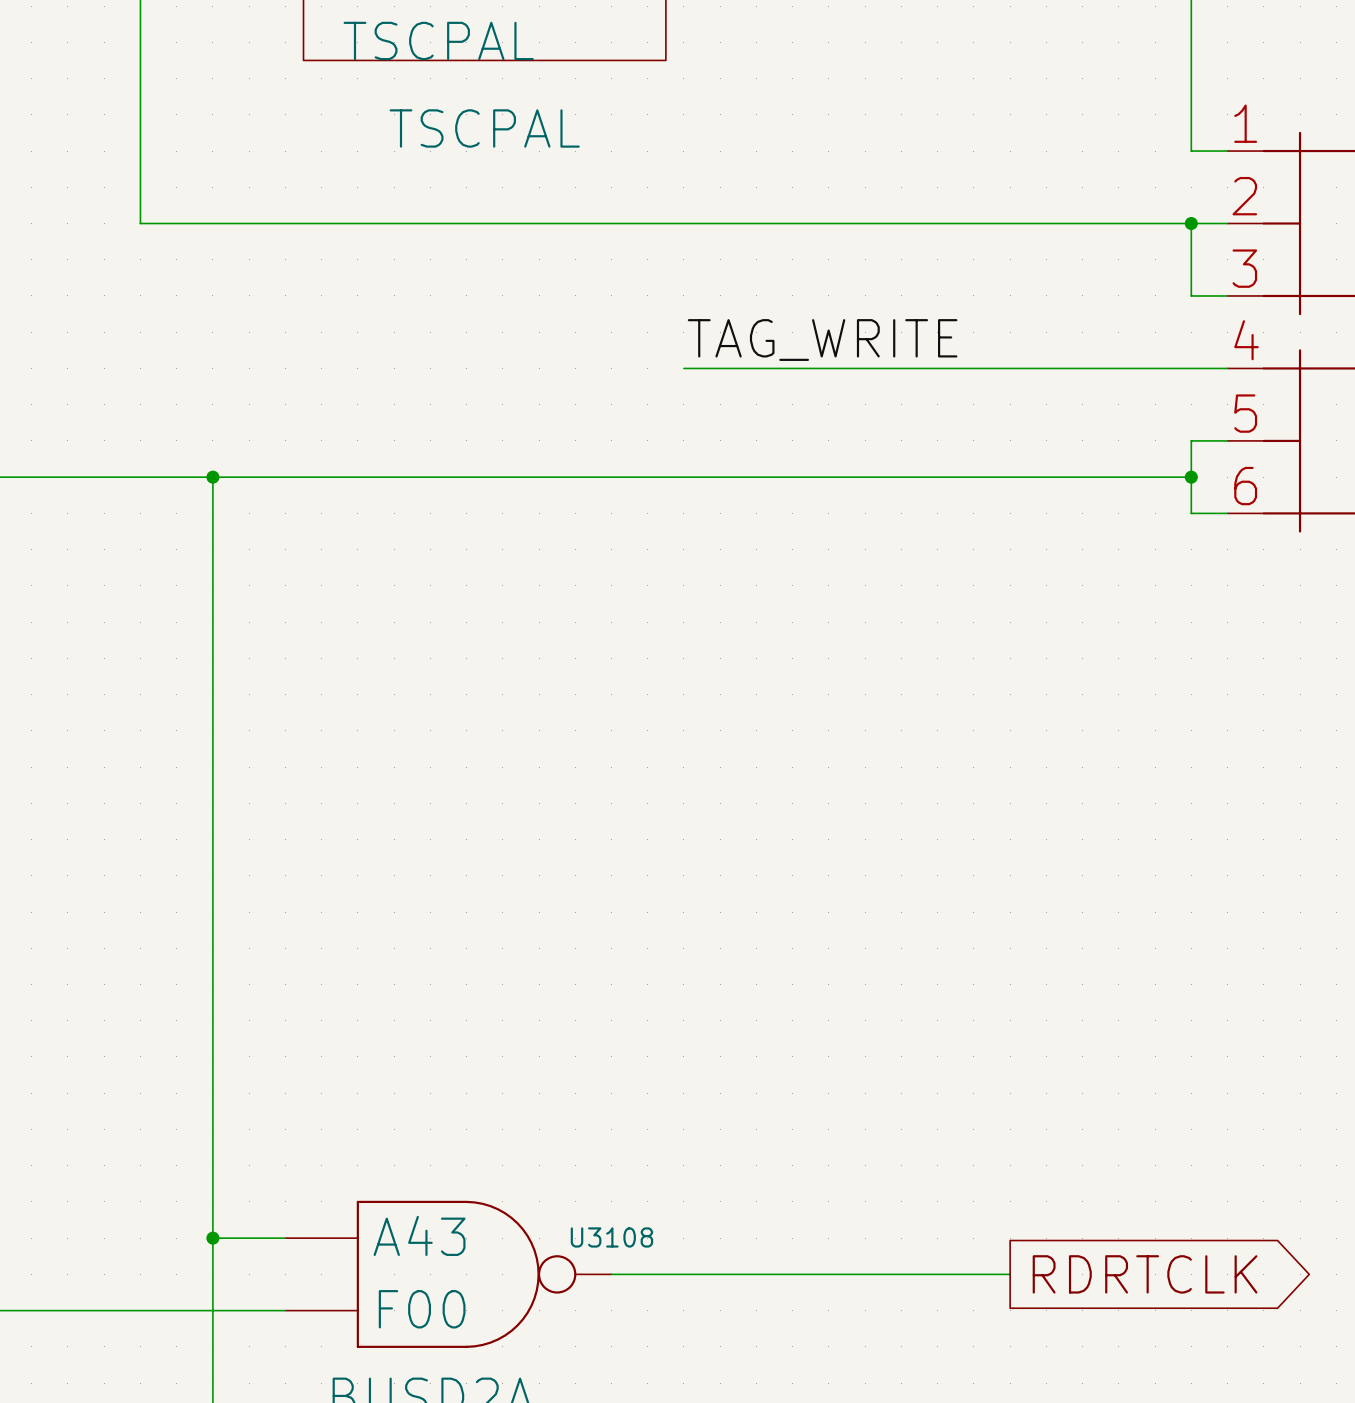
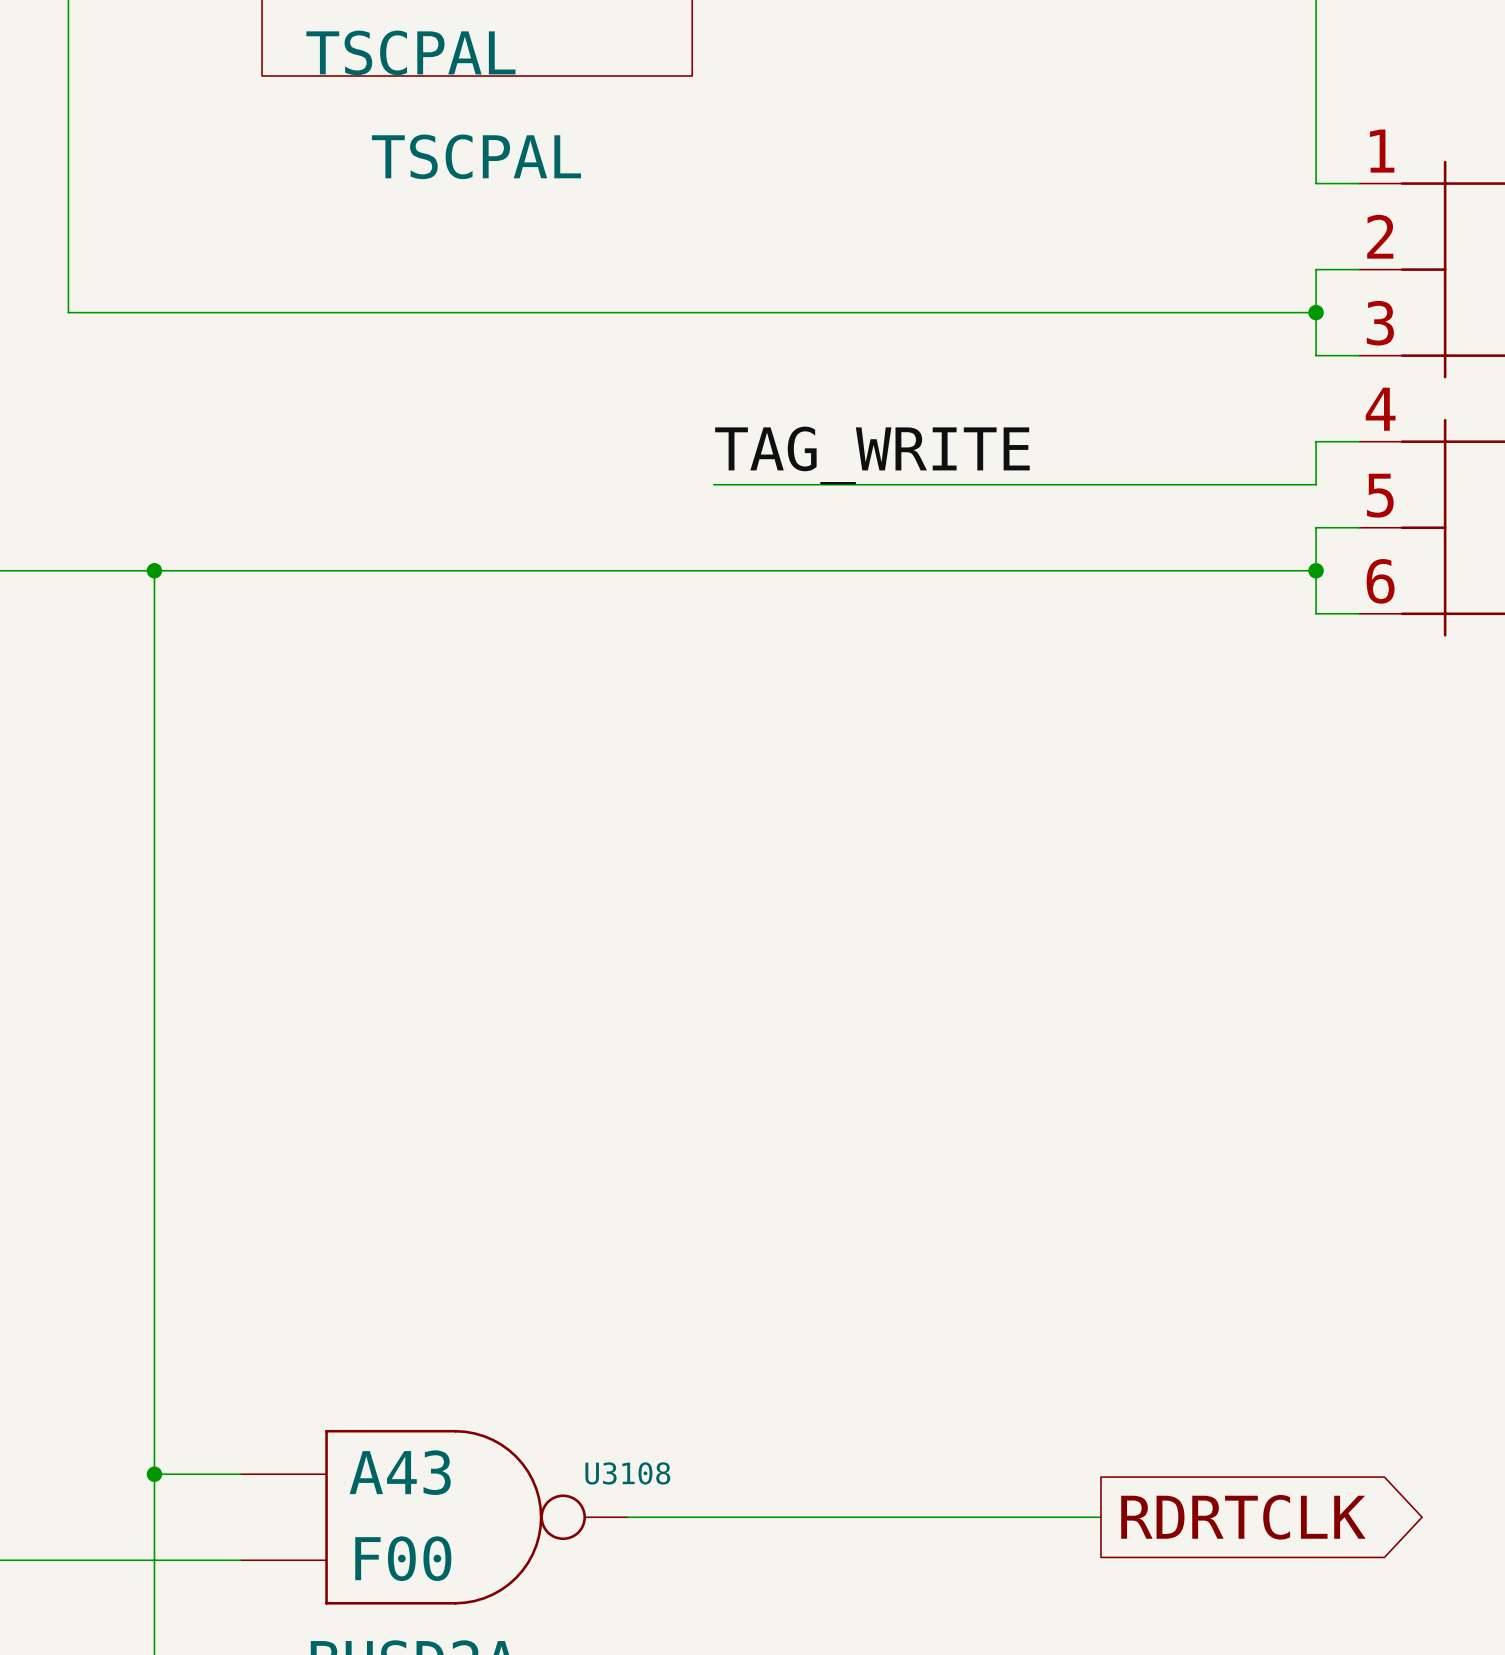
wire: (140, 223) (1191, 223) -> (68, 269) (68, 312) (1316, 312)
junction position: (1191, 223) -> (1316, 312)
label position: TAG_WRITE (822, 340) -> TAG_WRITE (872, 455)
wire: (683, 368) (1191, 368) -> (713, 484) (1316, 484) (1316, 441)

